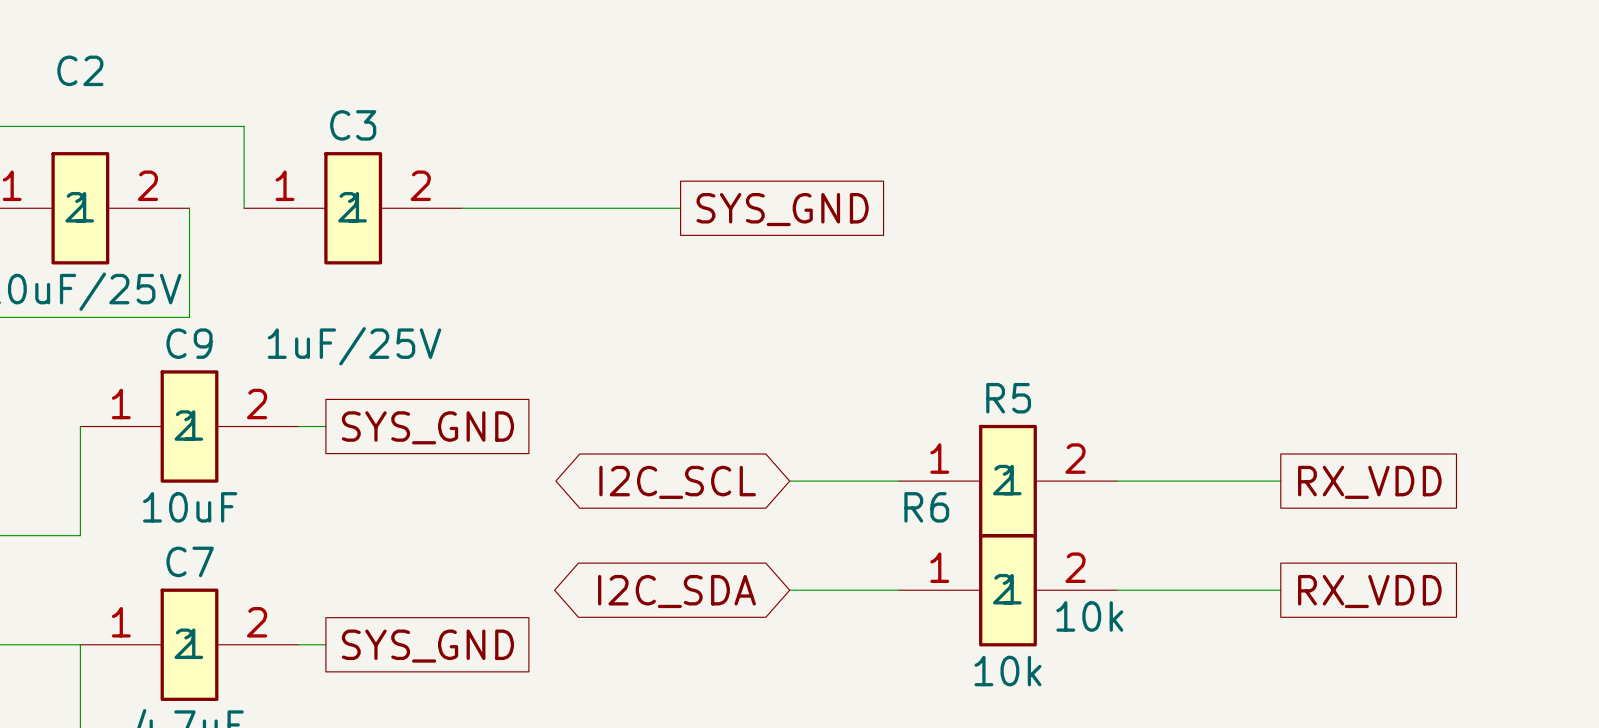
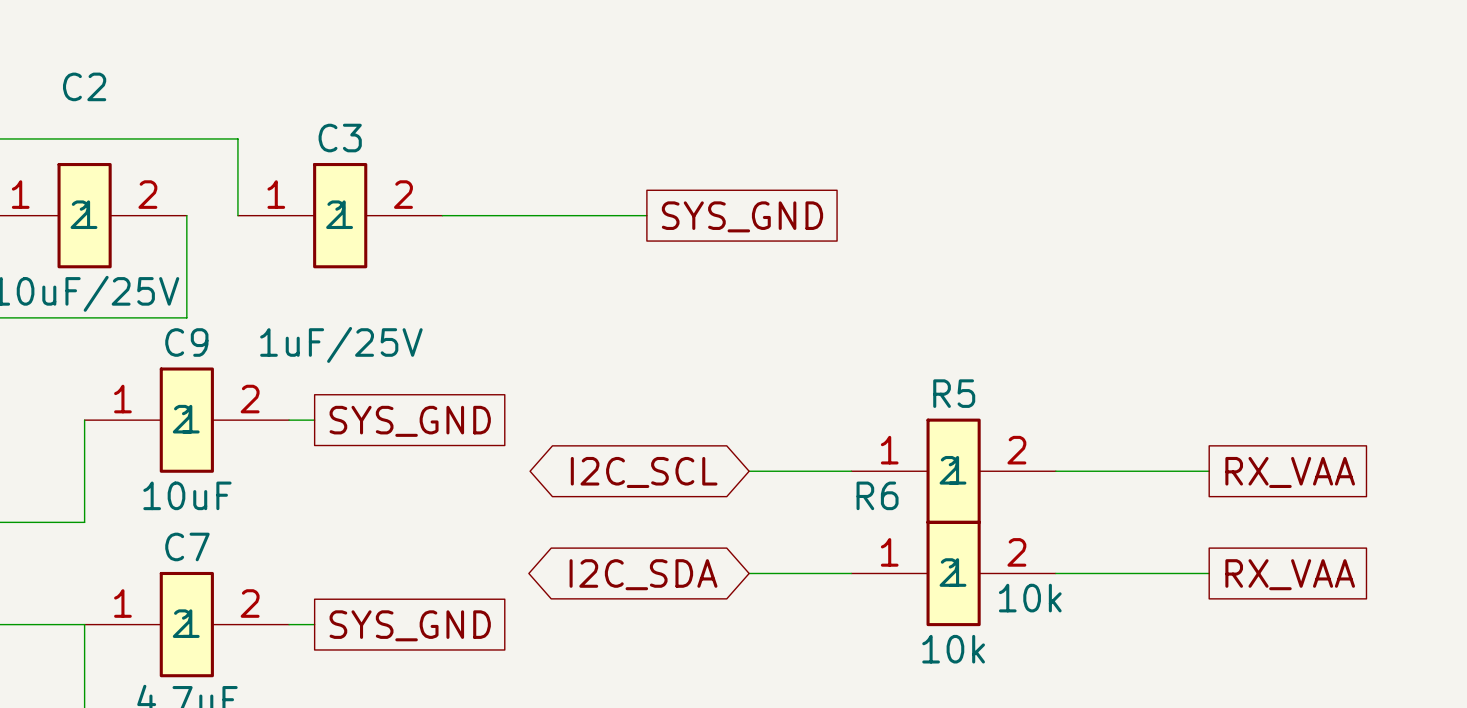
global label: RX_VDD (1369, 482) -> RX_VAA (1290, 472)
global label: RX_VDD (1369, 591) -> RX_VAA (1290, 574)

